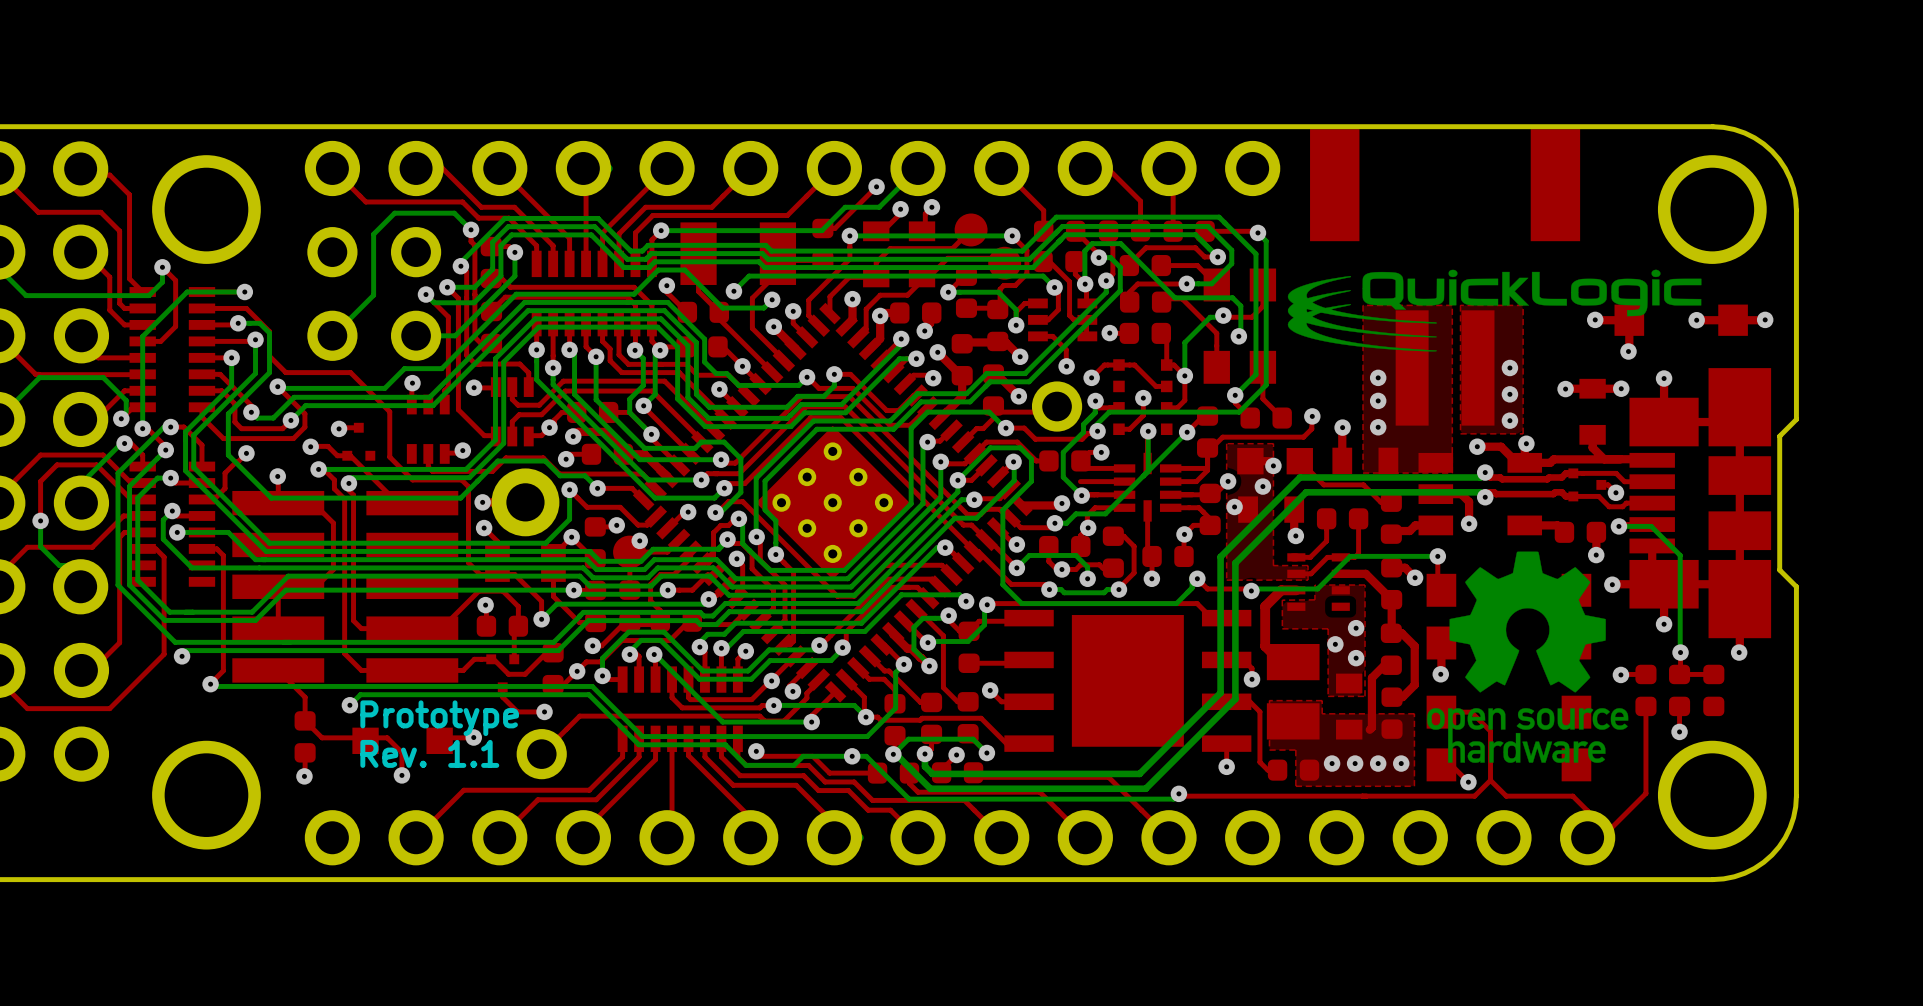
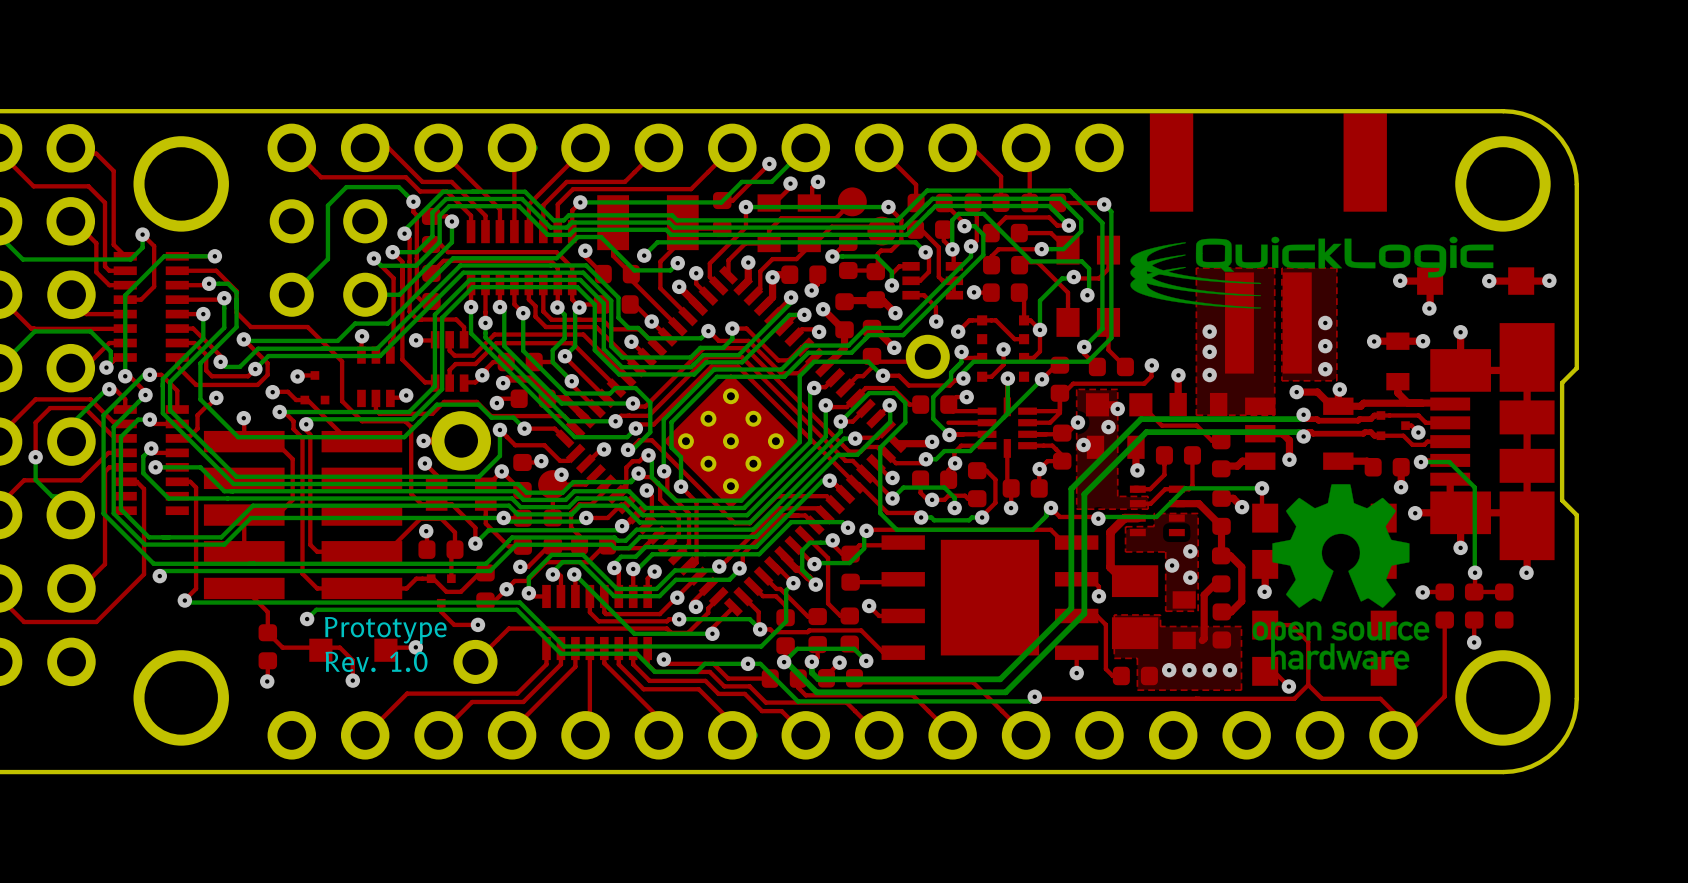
text: Rev. 1.1 (429, 753) -> Rev. 1.0 (376, 661)

